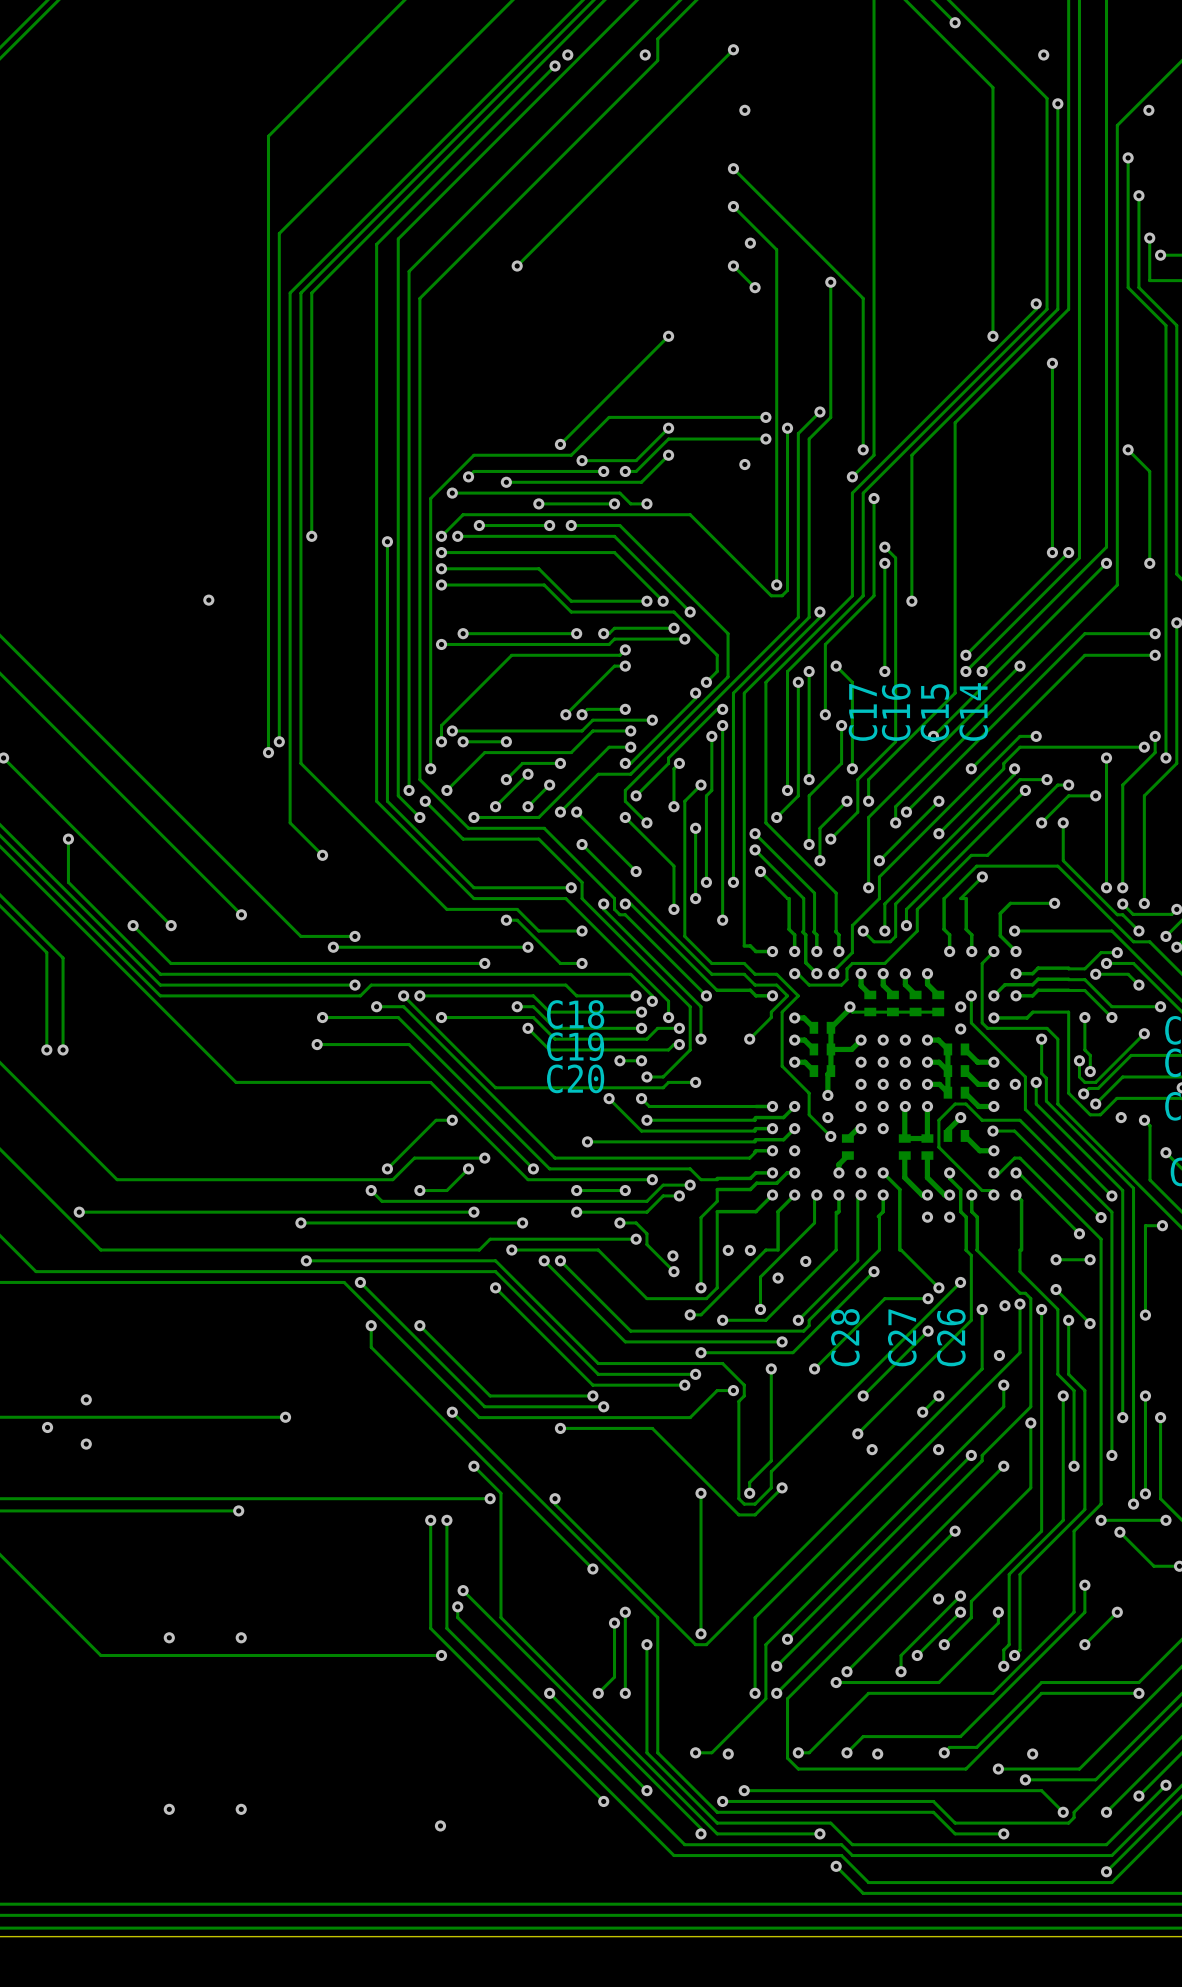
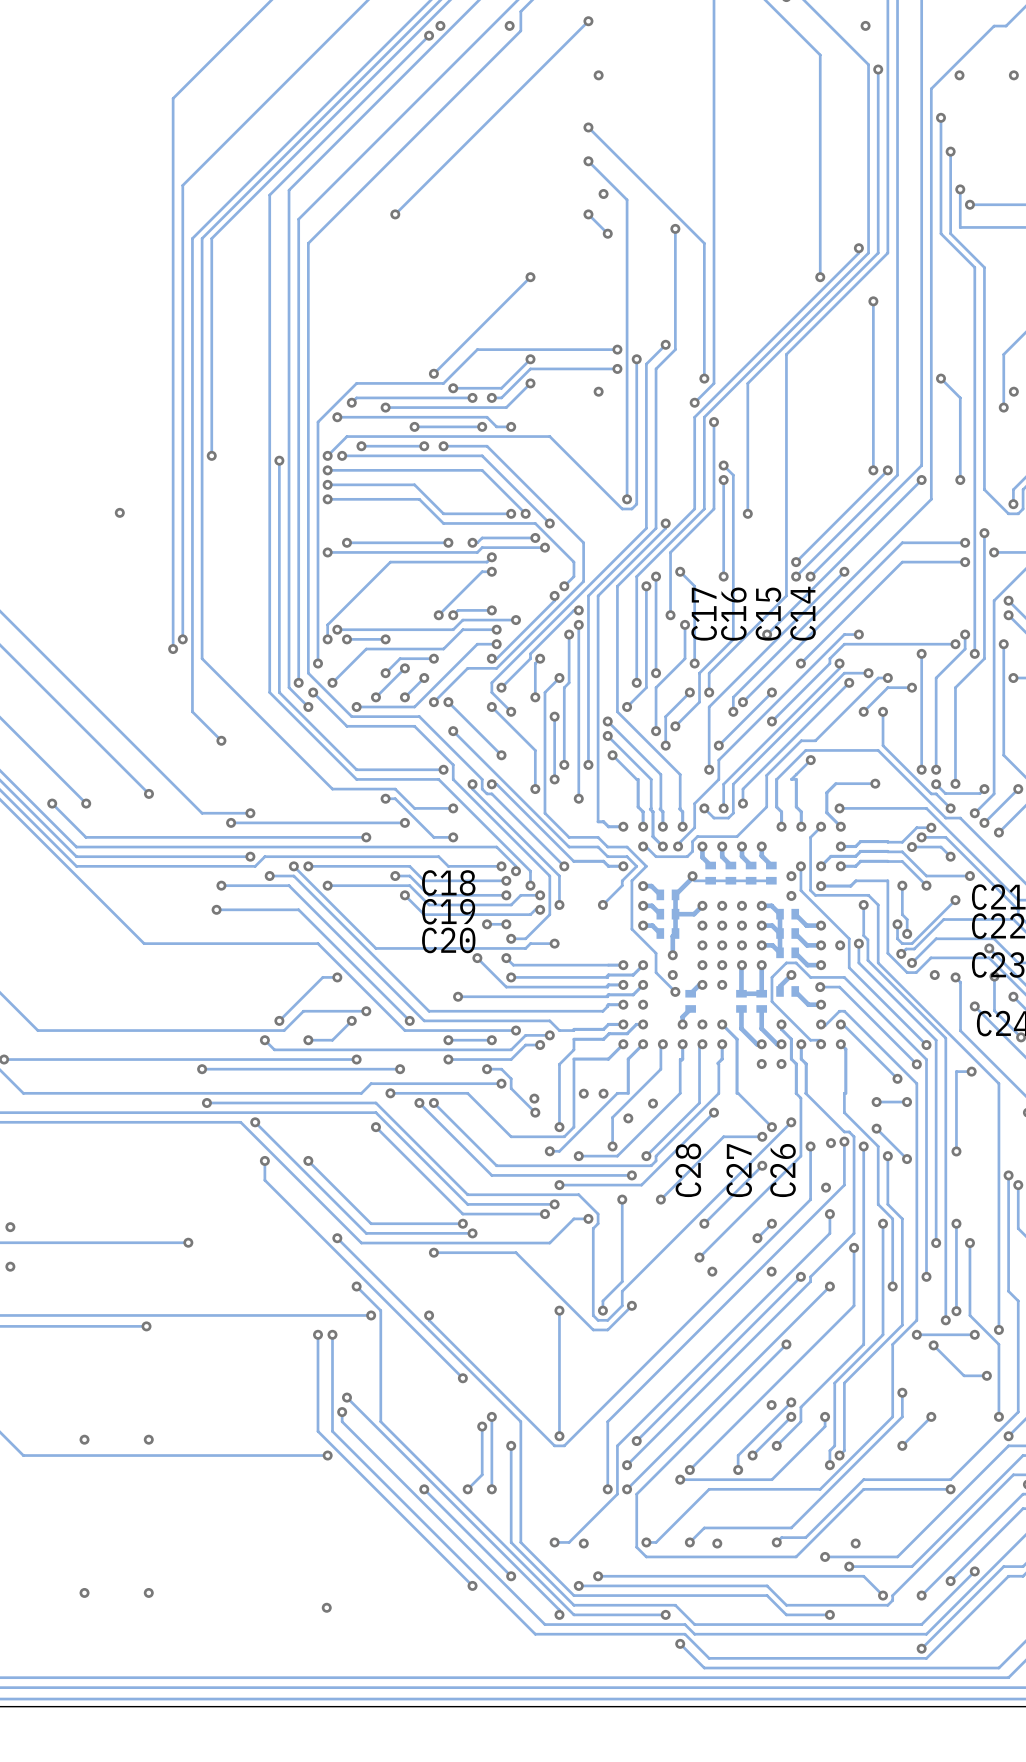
track: (971, 855) (917, 909) (917, 931) (884, 963) (852, 963) (846, 968) (846, 979) (841, 985) -> (801, 740) (766, 775) (766, 806) (737, 836) (697, 836) (692, 841) (692, 851) (685, 856)

